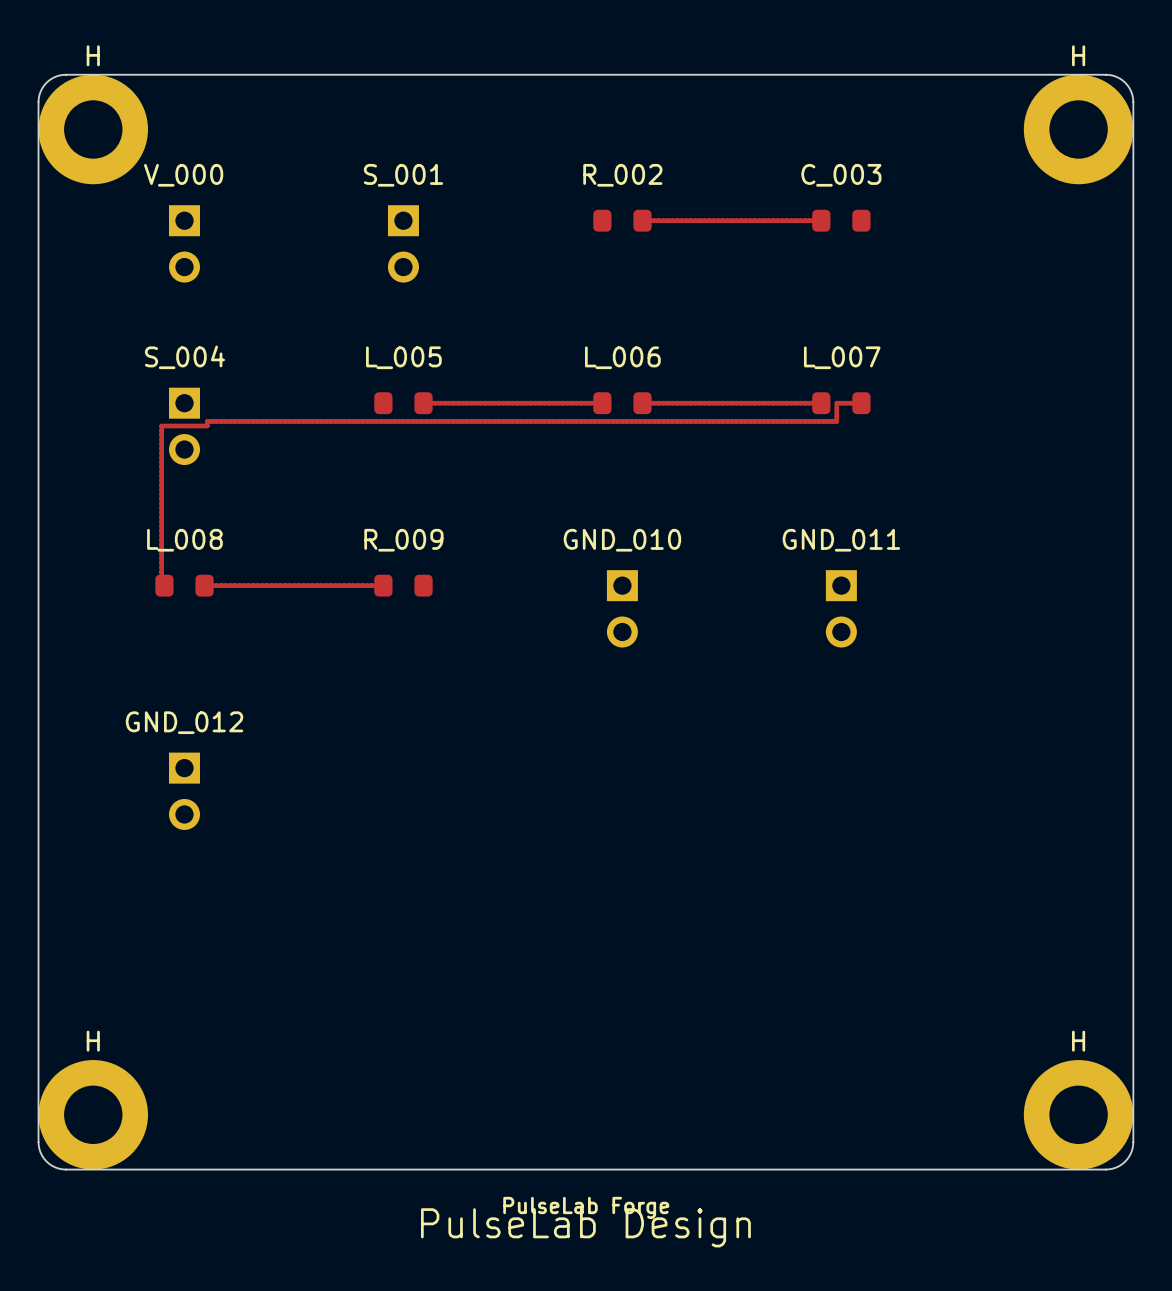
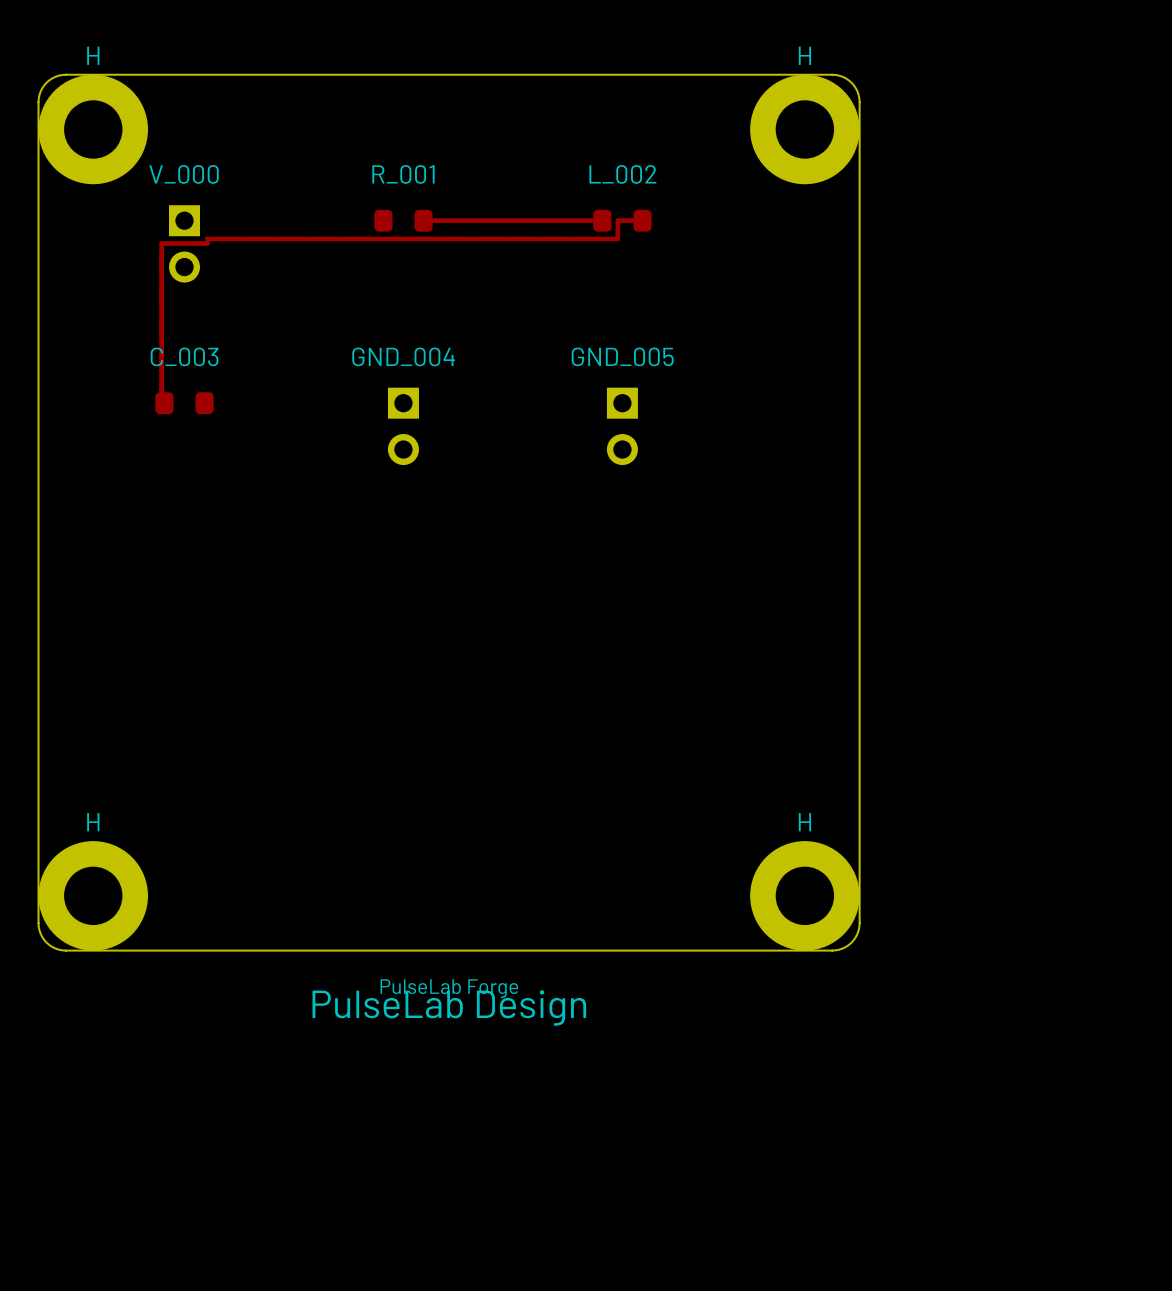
board edge: (832, 74) (1109, 74) (1122, 80) (1132, 95) (1133, 1142) (1131, 1152) (1125, 1161) (1116, 1167) (1105, 1169) (58, 1168) (46, 1161) (38, 1145) (38, 923) -> (832, 74) (842, 76) (851, 82) (857, 91) (859, 102) (859, 923) (857, 933) (851, 942) (842, 948) (832, 950) (65, 950) (55, 948) (46, 942) (40, 933) (38, 923)
H position: (1078, 129) -> (804, 129)
R_002 name: R_002 (622, 175) -> L_002 (622, 174)
R_001: none -> (403, 220)
track: (640, 220) (821, 220) -> (640, 220) (617, 220) (617, 238) (207, 238) (207, 243) (161, 243) (161, 403) (164, 403)
C_003 position: (841, 220) -> (184, 403)
S_001: (403, 243) -> none
L_005: (403, 403) -> none
track: (421, 403) (602, 403) -> (421, 220) (602, 220)
L_006: (622, 403) -> none
track: (640, 403) (821, 403) -> none
L_007: (841, 403) -> none
track: (859, 403) (836, 403) (836, 421) (207, 421) (207, 425) (161, 425) (161, 585) (164, 585) -> none
S_004: (184, 426) -> none
GND_004: none -> (403, 426)
GND_005: none -> (622, 426)
L_008: (184, 585) -> none
track: (202, 585) (383, 585) -> none
R_009: (403, 585) -> none
GND_010: (622, 608) -> none
GND_011: (841, 608) -> none
GND_012: (184, 791) -> none
H position: (93, 1114) -> (93, 895)
H position: (1078, 1114) -> (804, 895)
text position: PulseLab Forge (586, 1207) -> PulseLab Forge (449, 988)
text position: PulseLab Design (585, 1227) -> PulseLab Design (449, 1008)

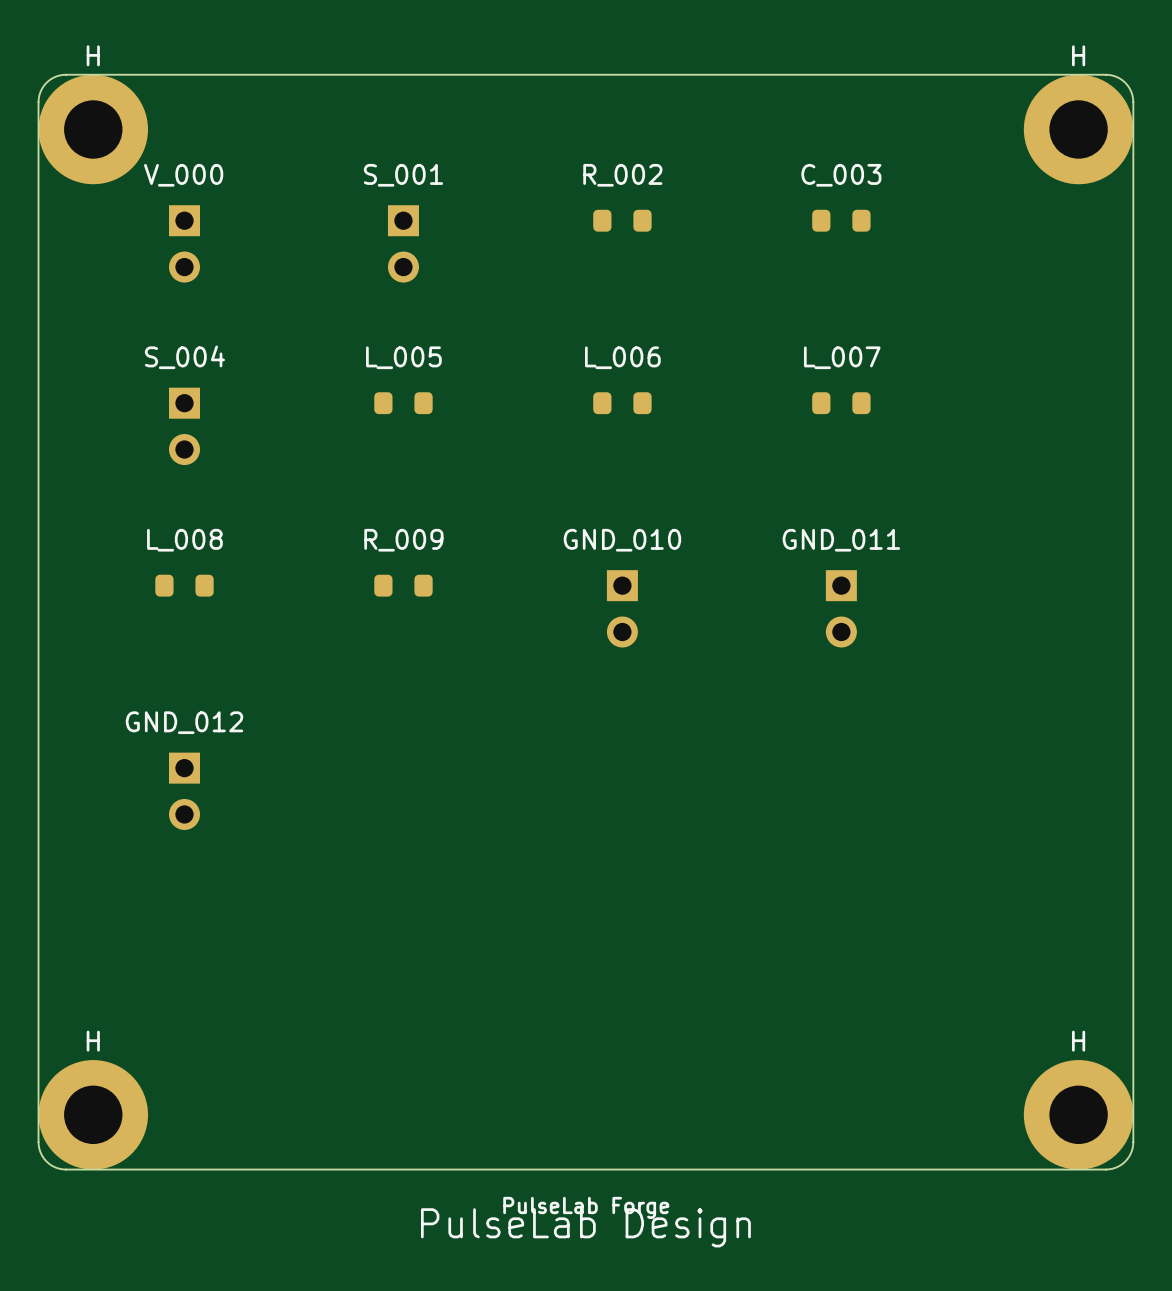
board edge: (832, 74) (842, 76) (851, 82) (857, 91) (859, 102) (859, 923) (857, 933) (851, 942) (842, 948) (832, 950) (65, 950) (55, 948) (46, 942) (40, 933) (38, 923) -> (832, 74) (1109, 74) (1122, 80) (1132, 95) (1133, 1142) (1131, 1152) (1125, 1161) (1116, 1167) (1105, 1169) (58, 1168) (46, 1161) (38, 1145) (38, 923)
H position: (804, 129) -> (1078, 129)
L_002 name: L_002 (622, 174) -> R_002 (622, 175)
R_001: (403, 220) -> none
track: (421, 220) (602, 220) -> none
track: (640, 220) (617, 220) (617, 238) (207, 238) (207, 243) (161, 243) (161, 403) (164, 403) -> none
S_001: none -> (403, 243)
C_003 position: (184, 403) -> (841, 220)
L_005: none -> (403, 403)
L_006: none -> (622, 403)
L_007: none -> (841, 403)
S_004: none -> (184, 426)
GND_004: (403, 426) -> none
GND_005: (622, 426) -> none
L_008: none -> (184, 585)
R_009: none -> (403, 585)
GND_010: none -> (622, 608)
GND_011: none -> (841, 608)
GND_012: none -> (184, 791)
H position: (93, 895) -> (93, 1114)
H position: (804, 895) -> (1078, 1114)
text position: PulseLab Forge (449, 988) -> PulseLab Forge (586, 1207)
text position: PulseLab Design (449, 1008) -> PulseLab Design (585, 1227)

